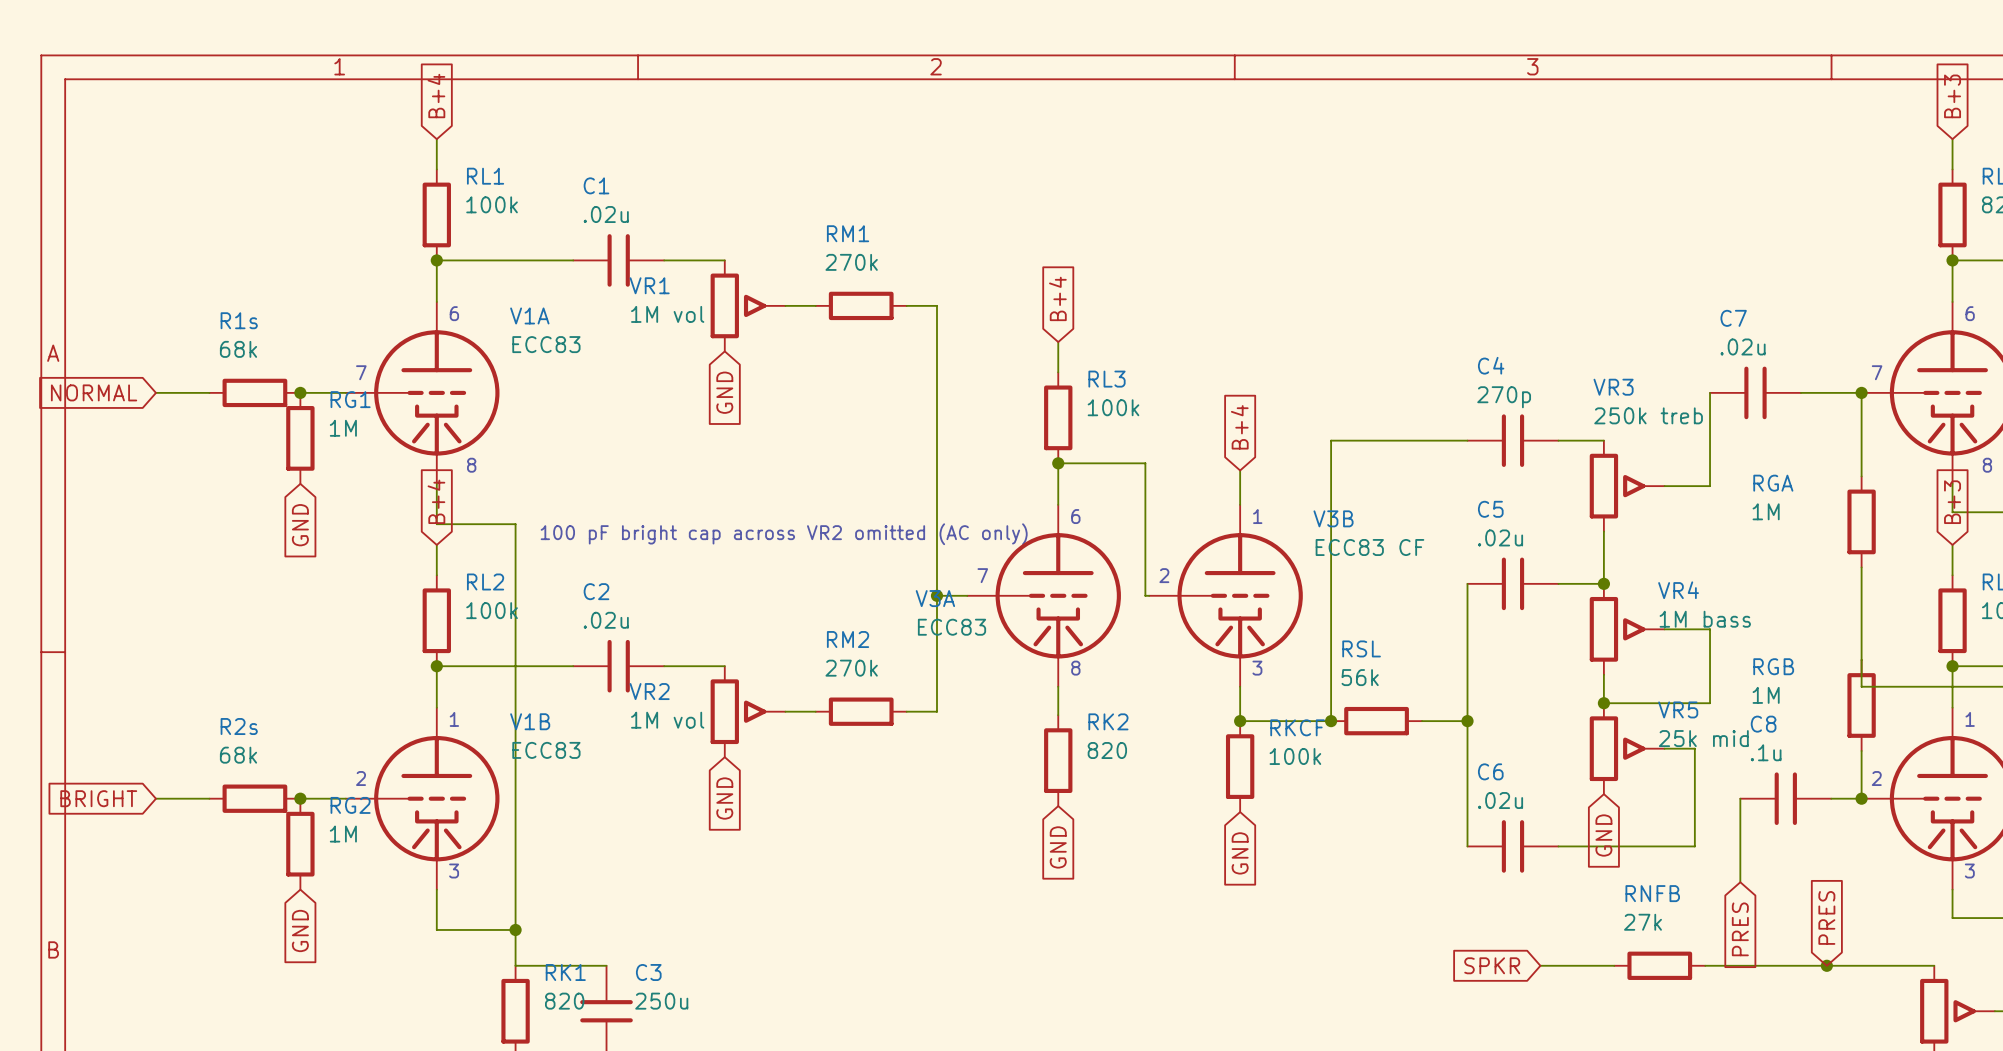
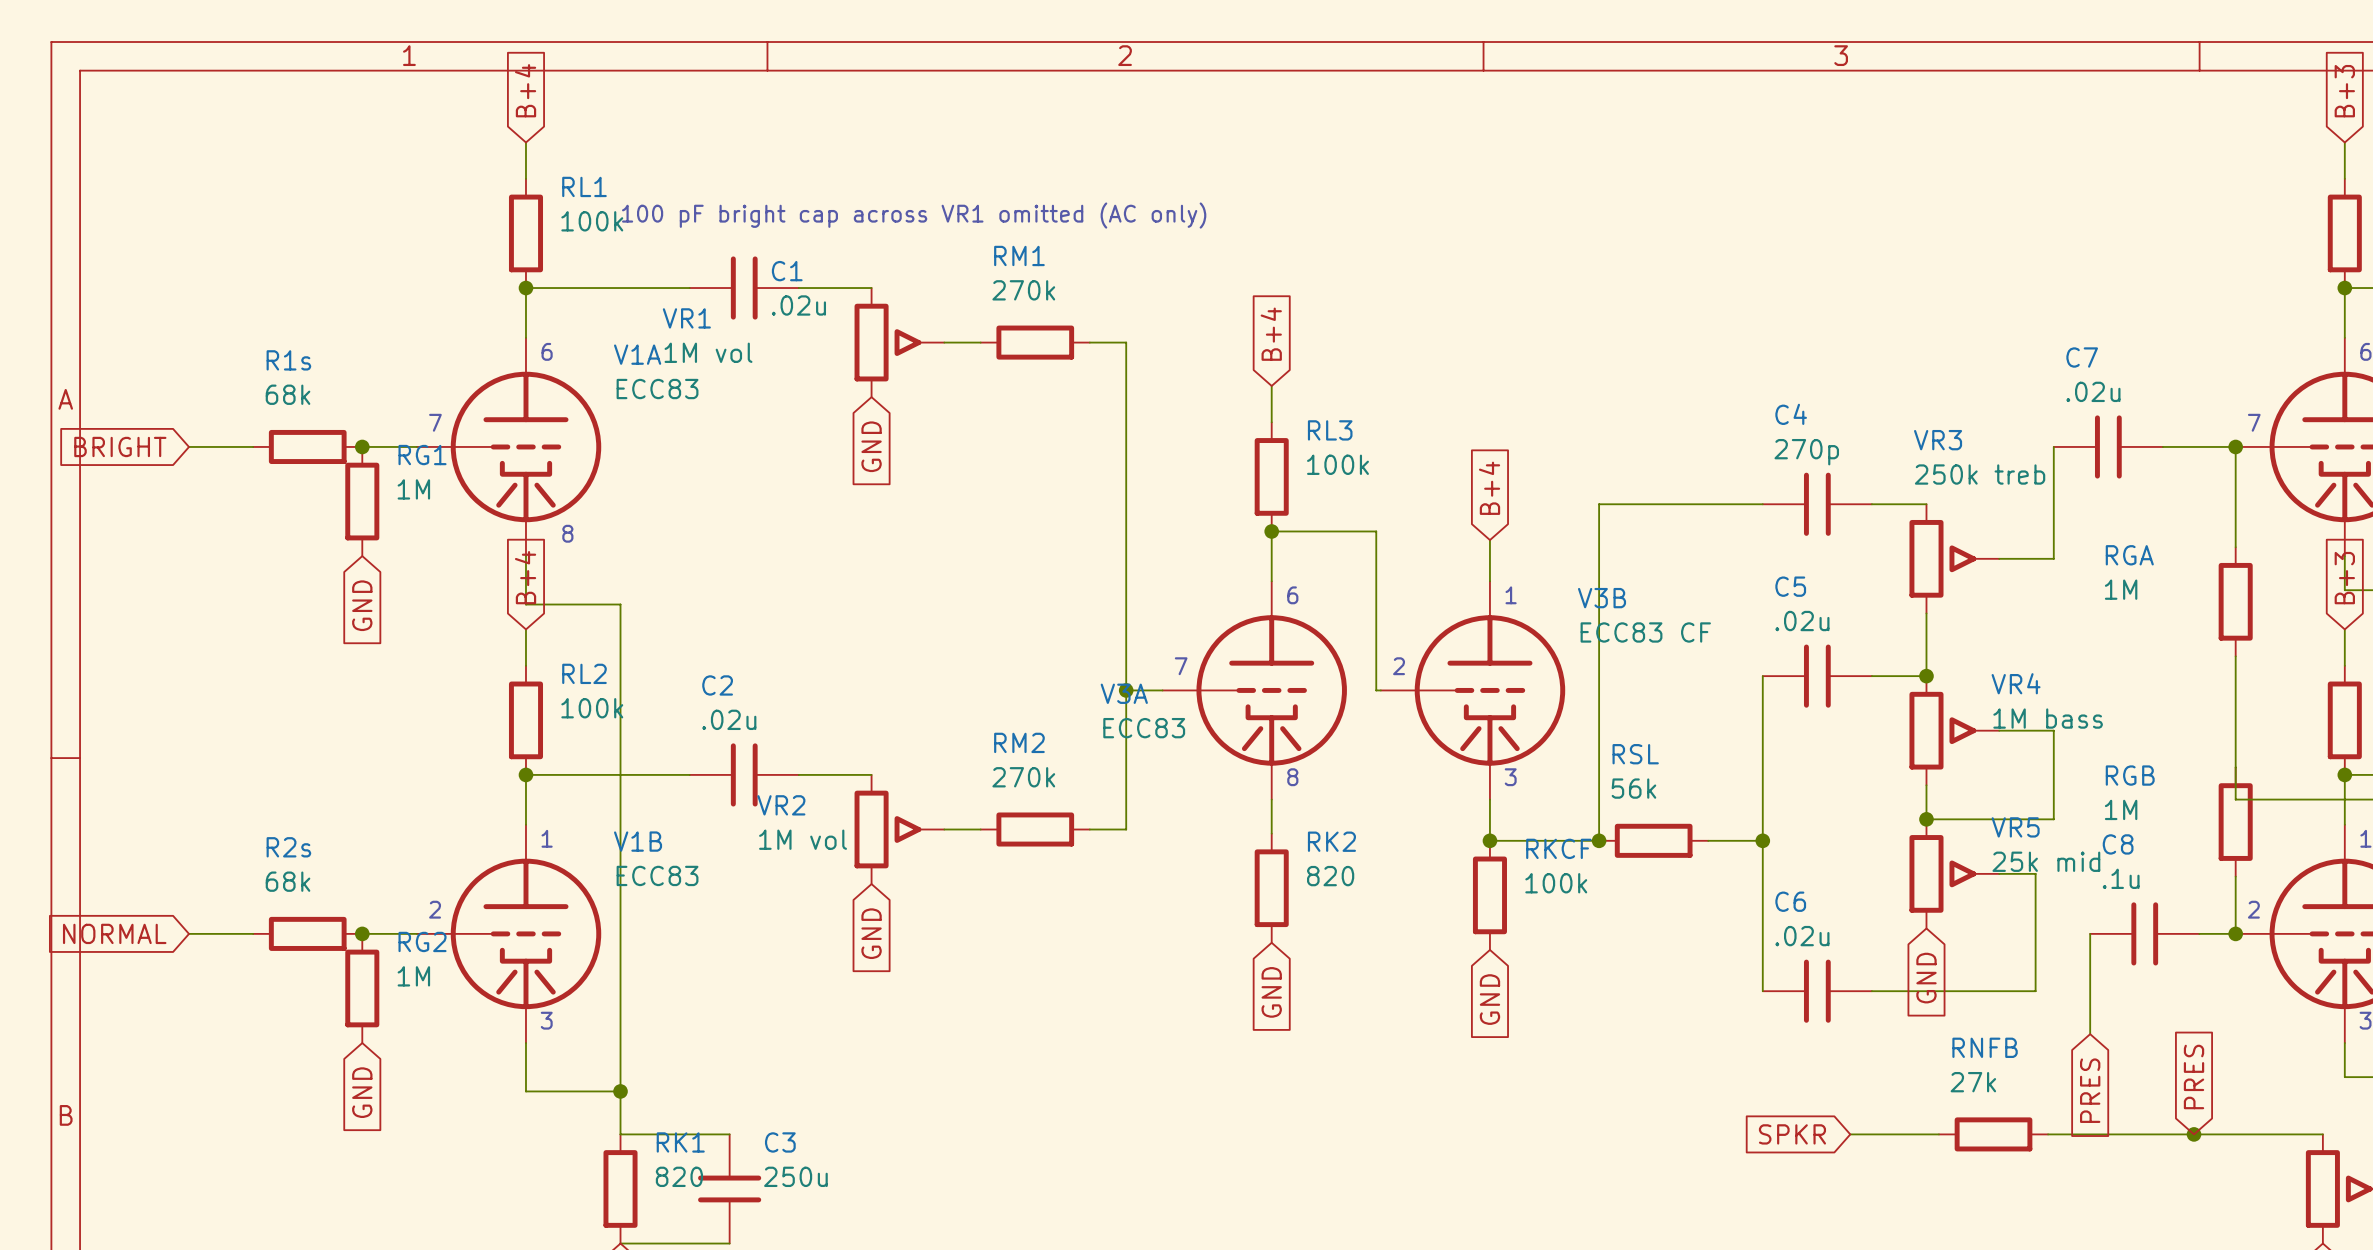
C1 name position: C1 (596, 185) -> C1 (787, 271)
text: none -> 100 pF bright cap across VR1 omitted (AC only) (914, 215)
C1 value position: .02u (606, 214) -> .02u (798, 305)
VR1 name position: VR1 (649, 285) -> VR1 (686, 318)
VR1 value position: 1M vol (667, 314) -> 1M vol (708, 352)
global label: NORMAL (94, 392) -> BRIGHT (120, 446)
text: 100 pF bright cap across VR2 omitted (AC only) (784, 534) -> none
global label: BRIGHT (98, 798) -> NORMAL (114, 933)

